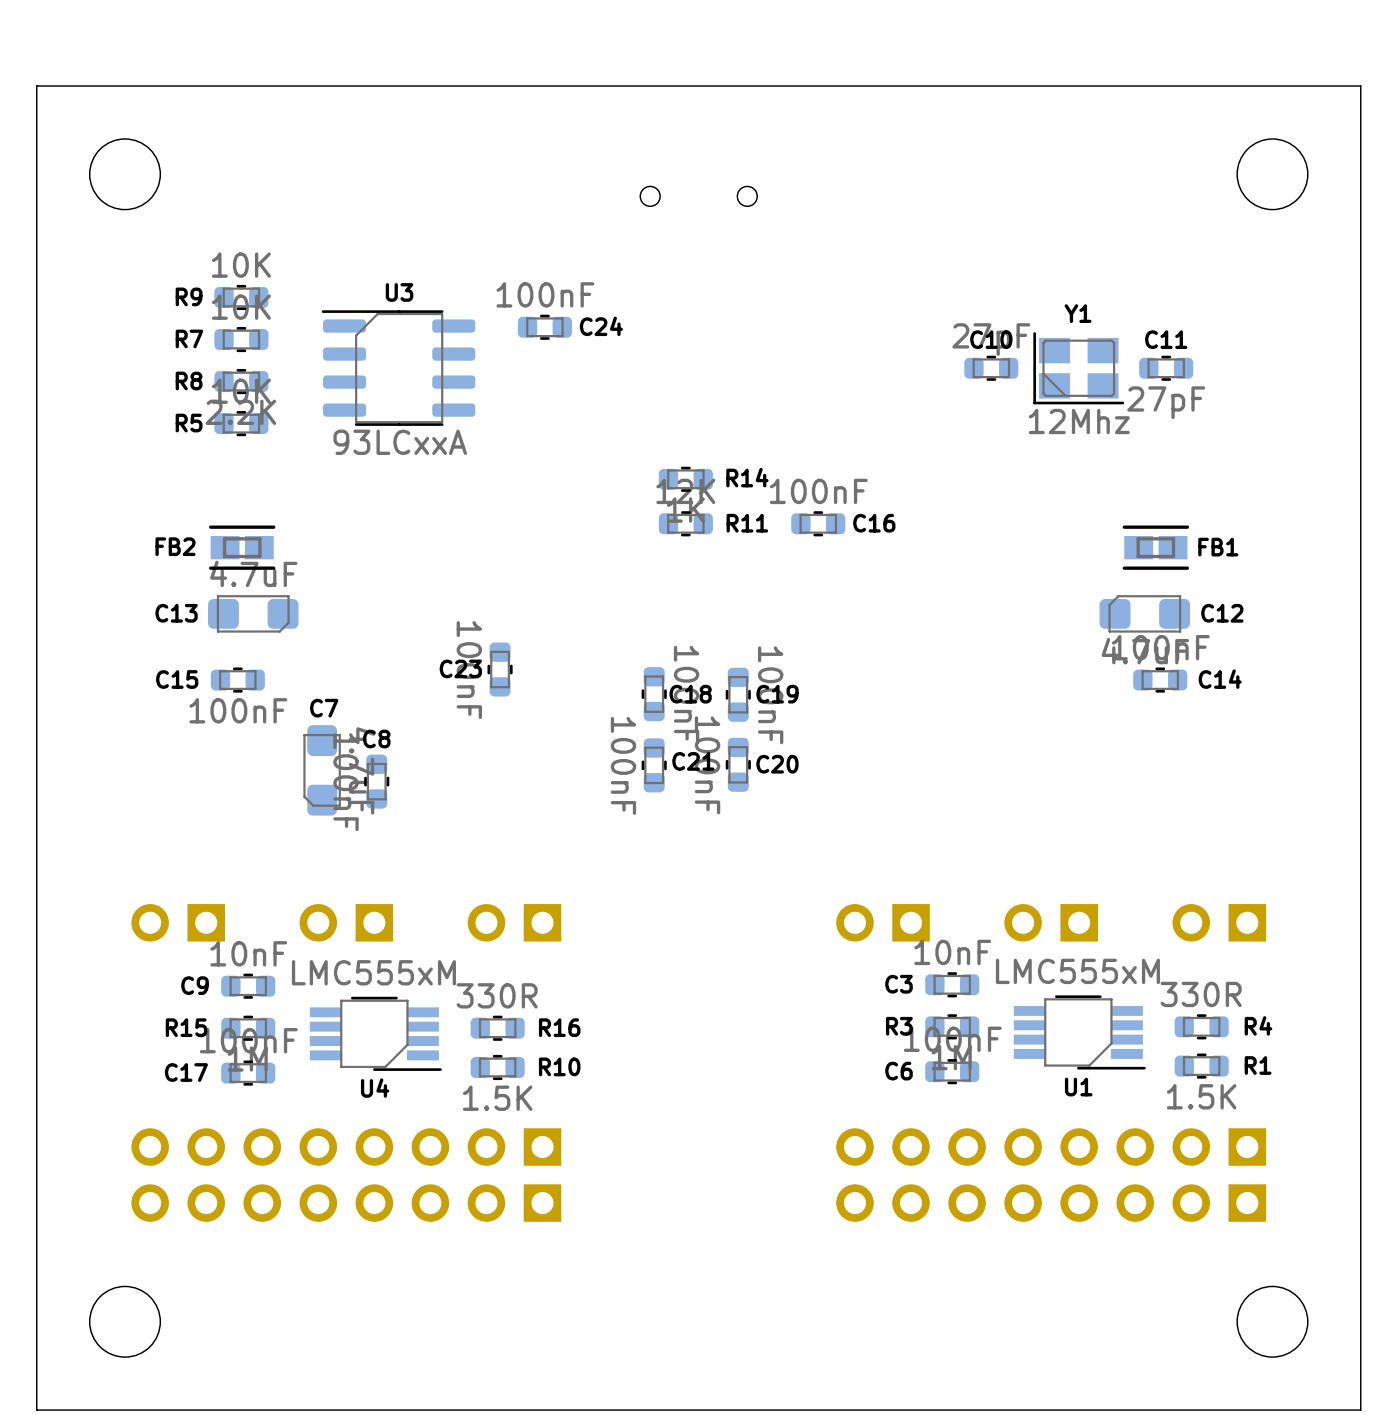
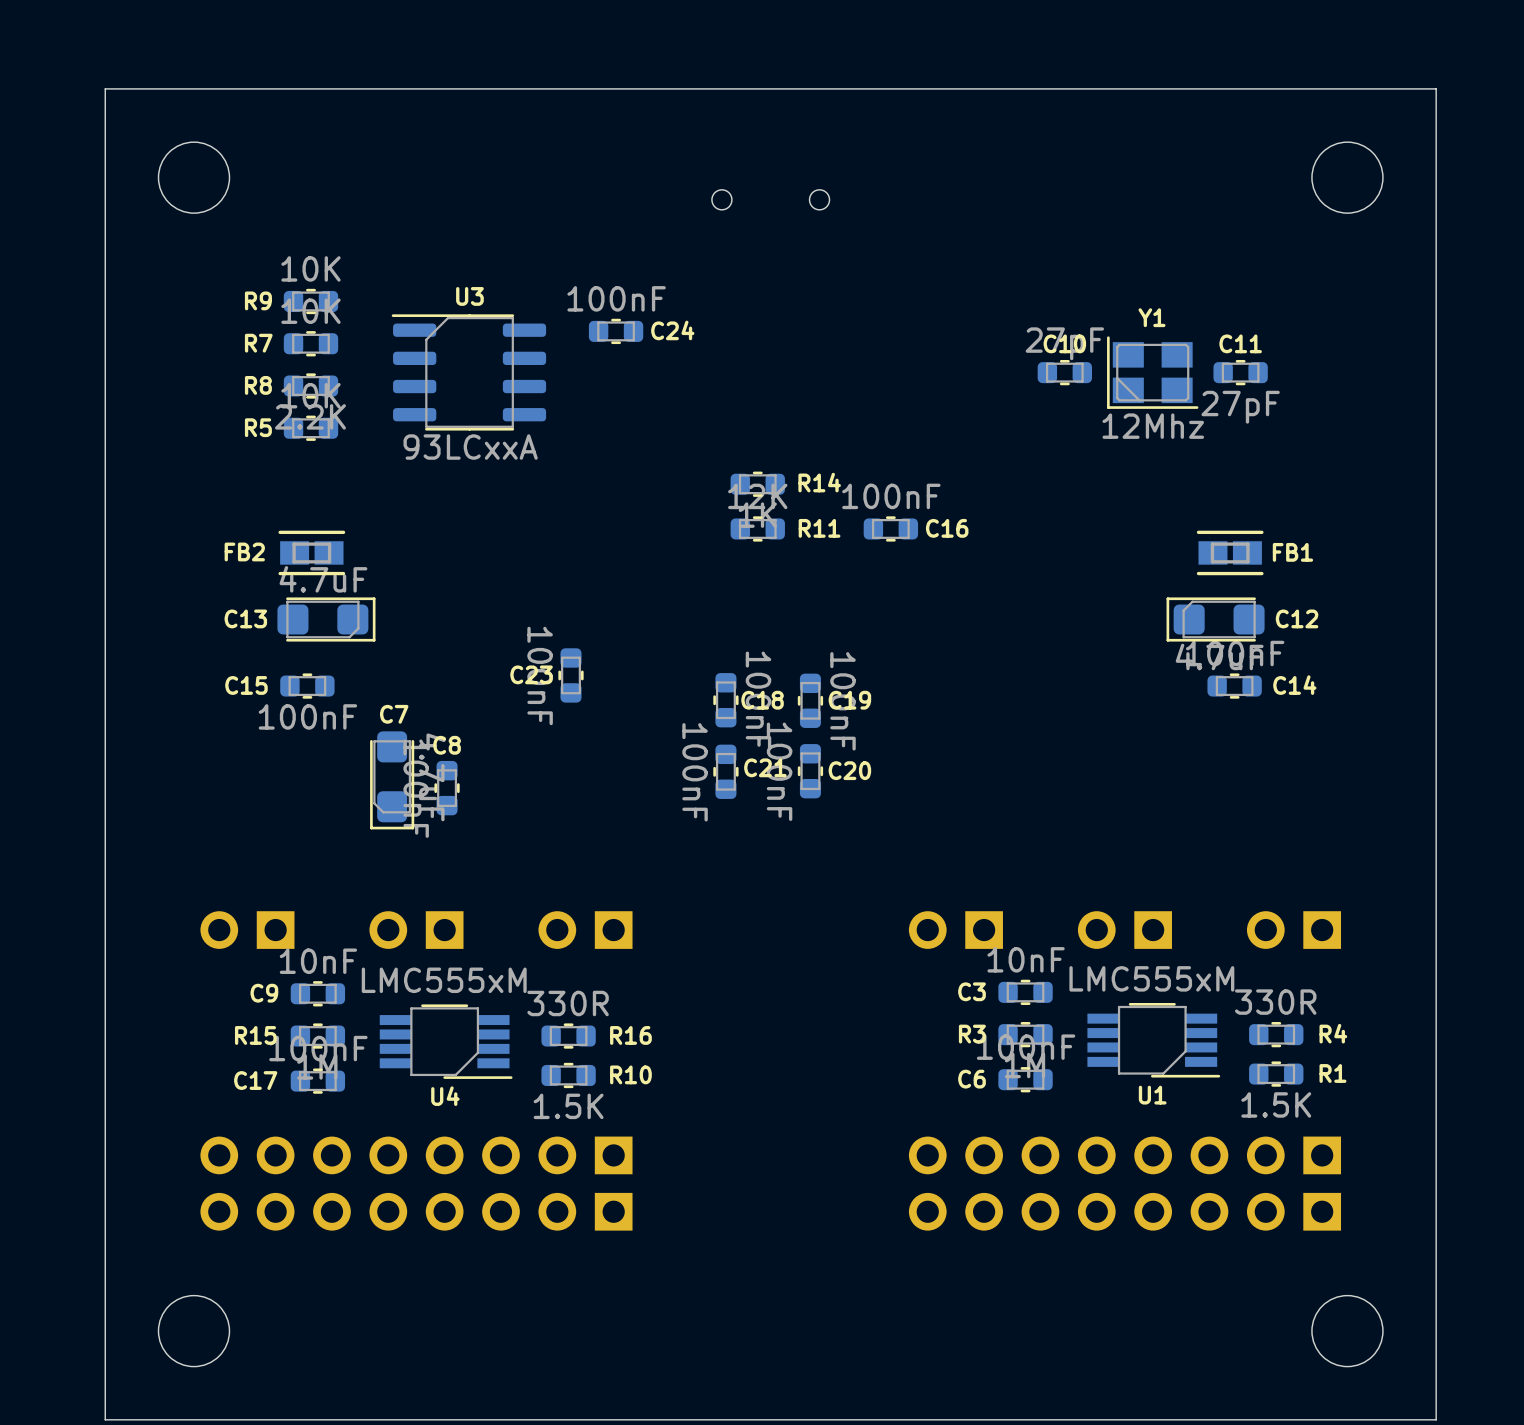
C13 footprint: [208, 595, 299, 633] -> [277, 597, 376, 642]
C12 footprint: [1099, 595, 1191, 633] -> [1166, 597, 1265, 642]
C7 footprint: [303, 725, 341, 816] -> [370, 731, 415, 830]

